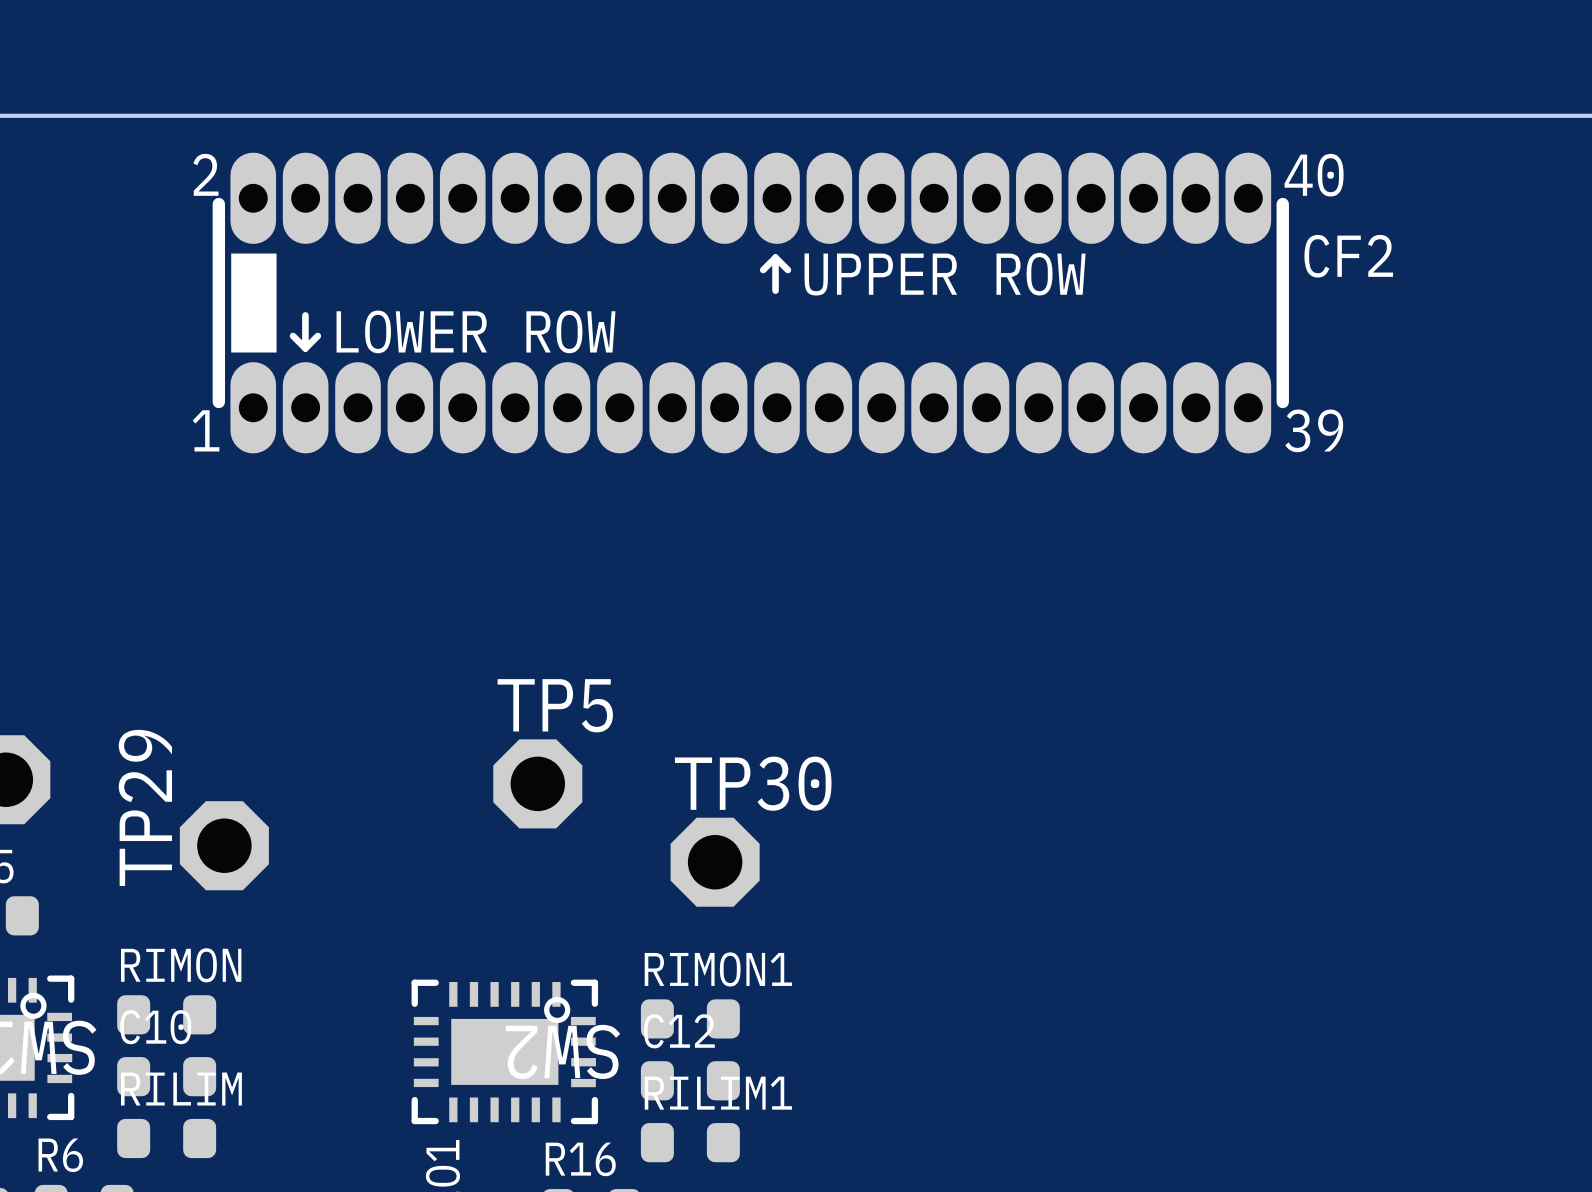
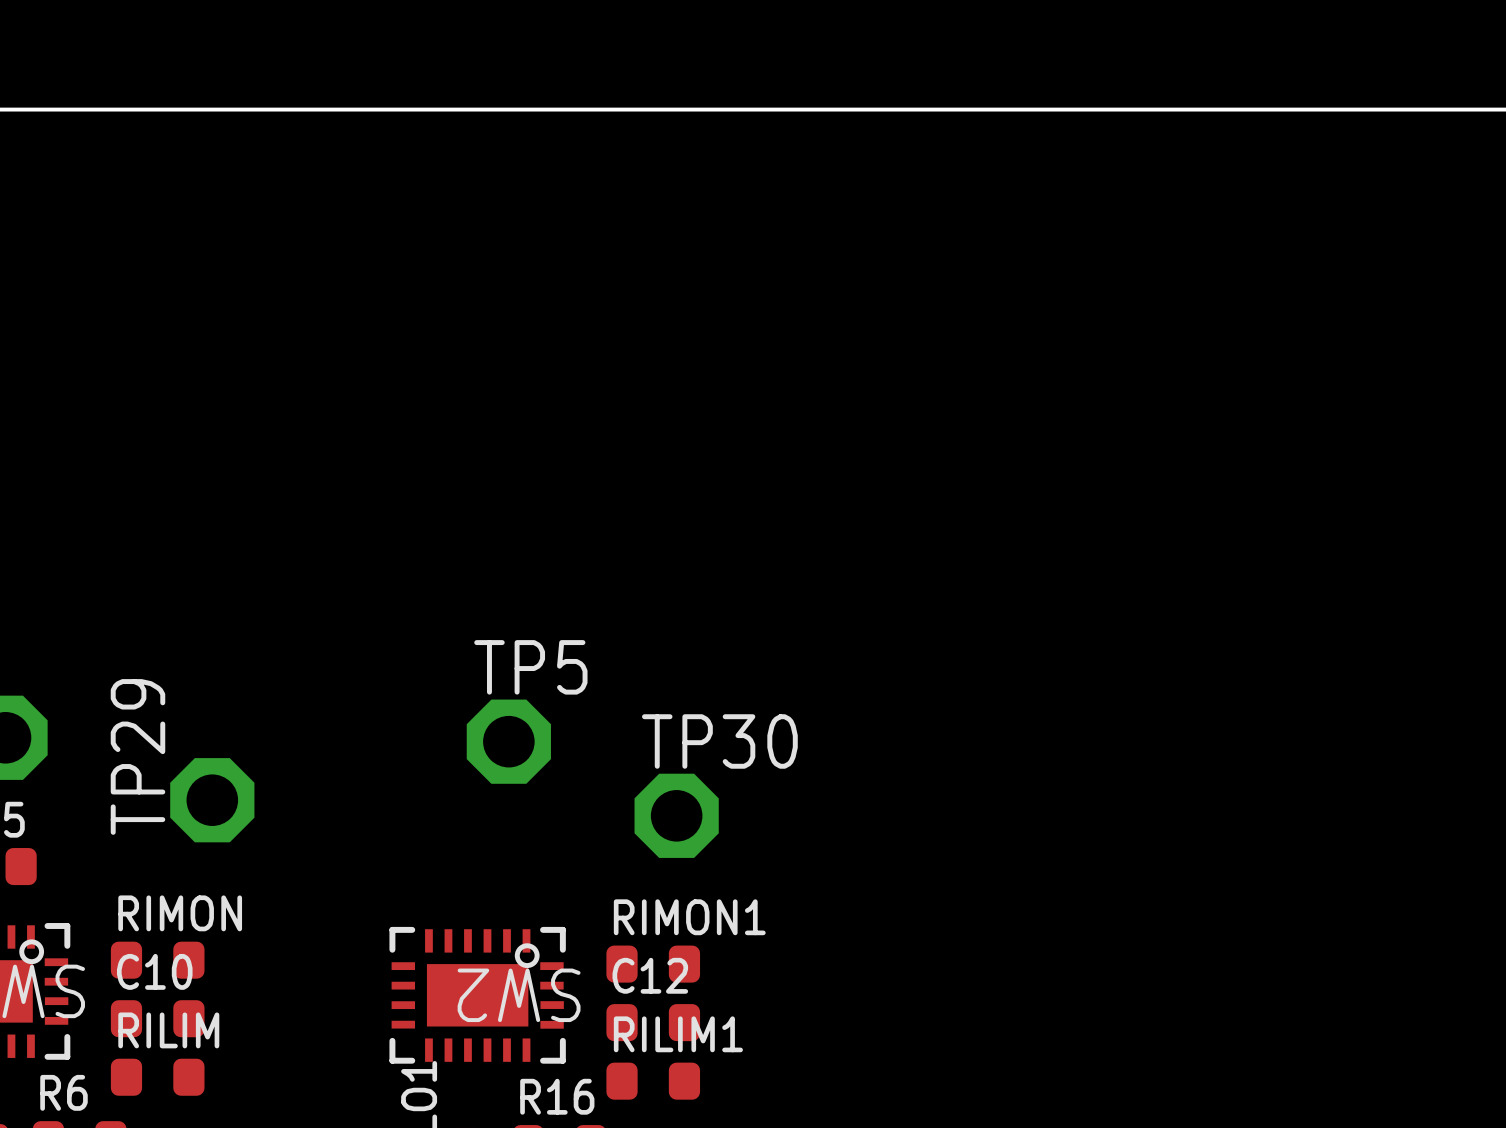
CF2: (750, 303) -> none

